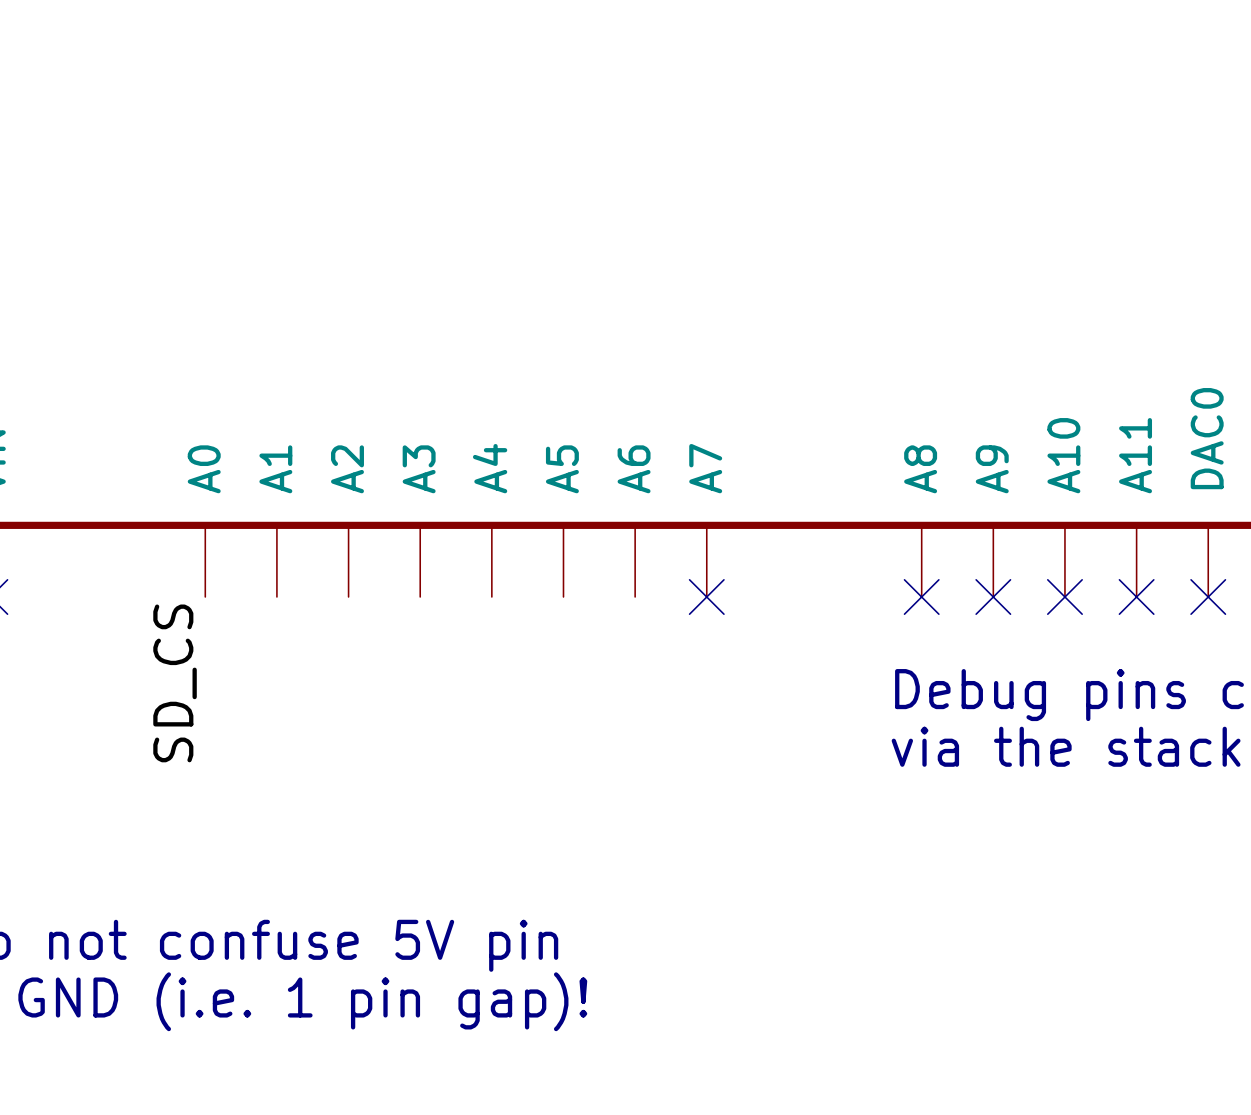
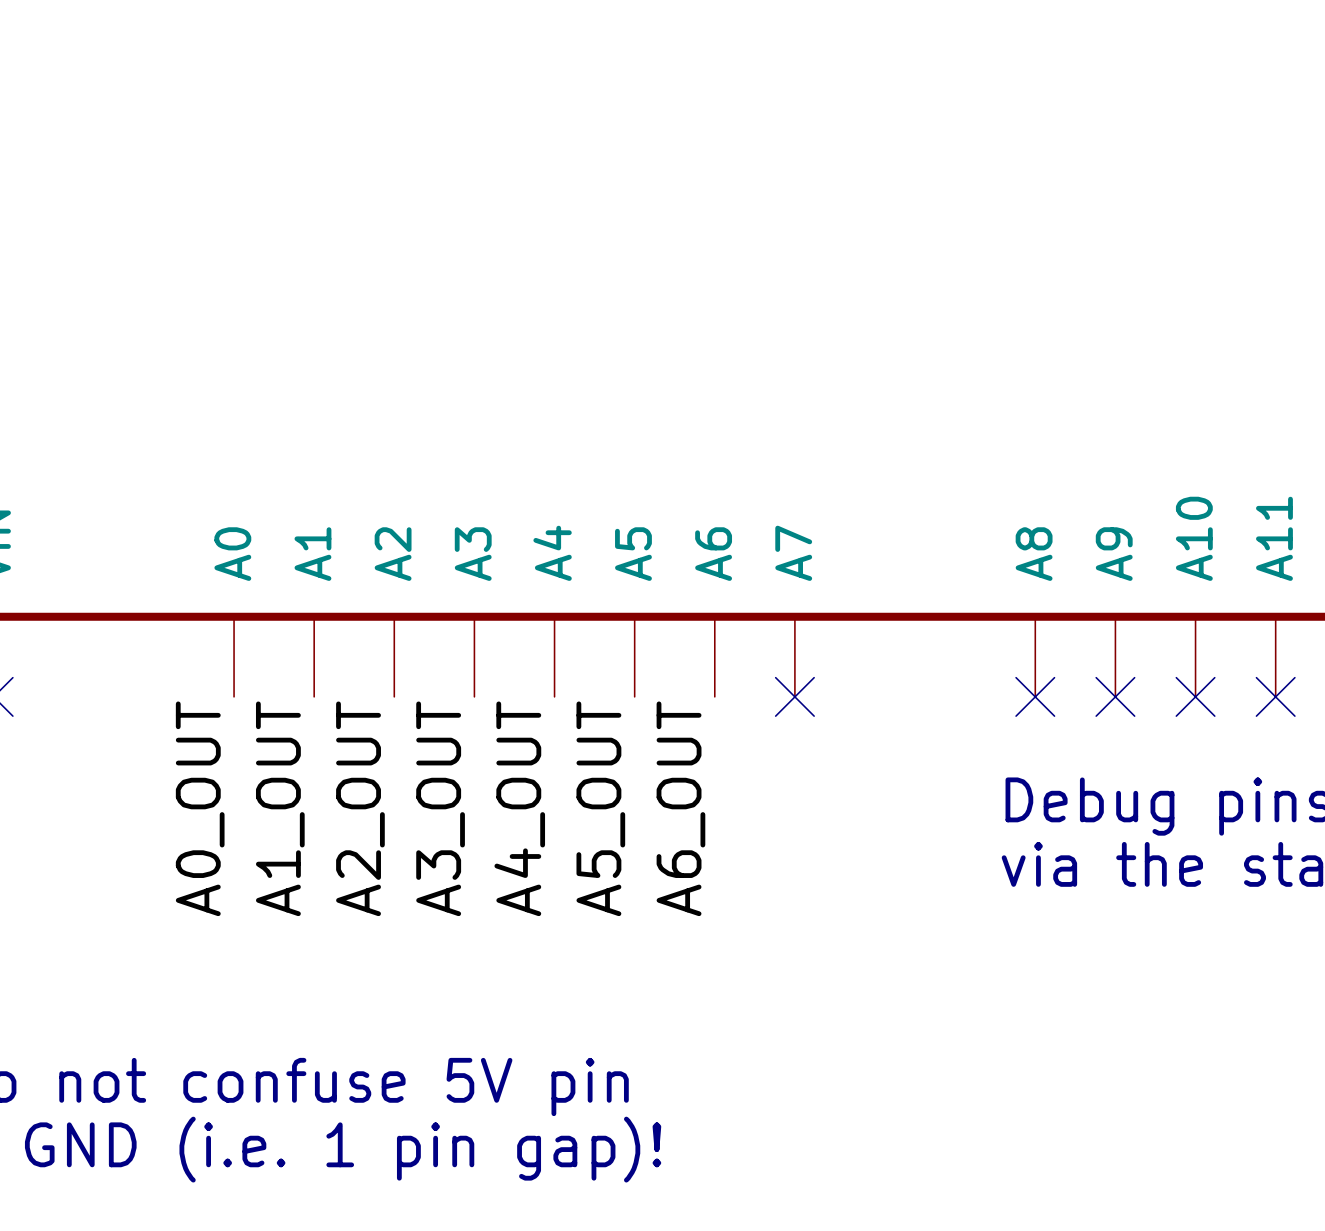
label: SD_CS (175, 683) -> A0_OUT (200, 808)
label: none -> A1_OUT (280, 808)
label: none -> A2_OUT (360, 808)
label: none -> A3_OUT (440, 808)
label: none -> A4_OUT (519, 808)
label: none -> A5_OUT (600, 808)
label: none -> A6_OUT (680, 808)

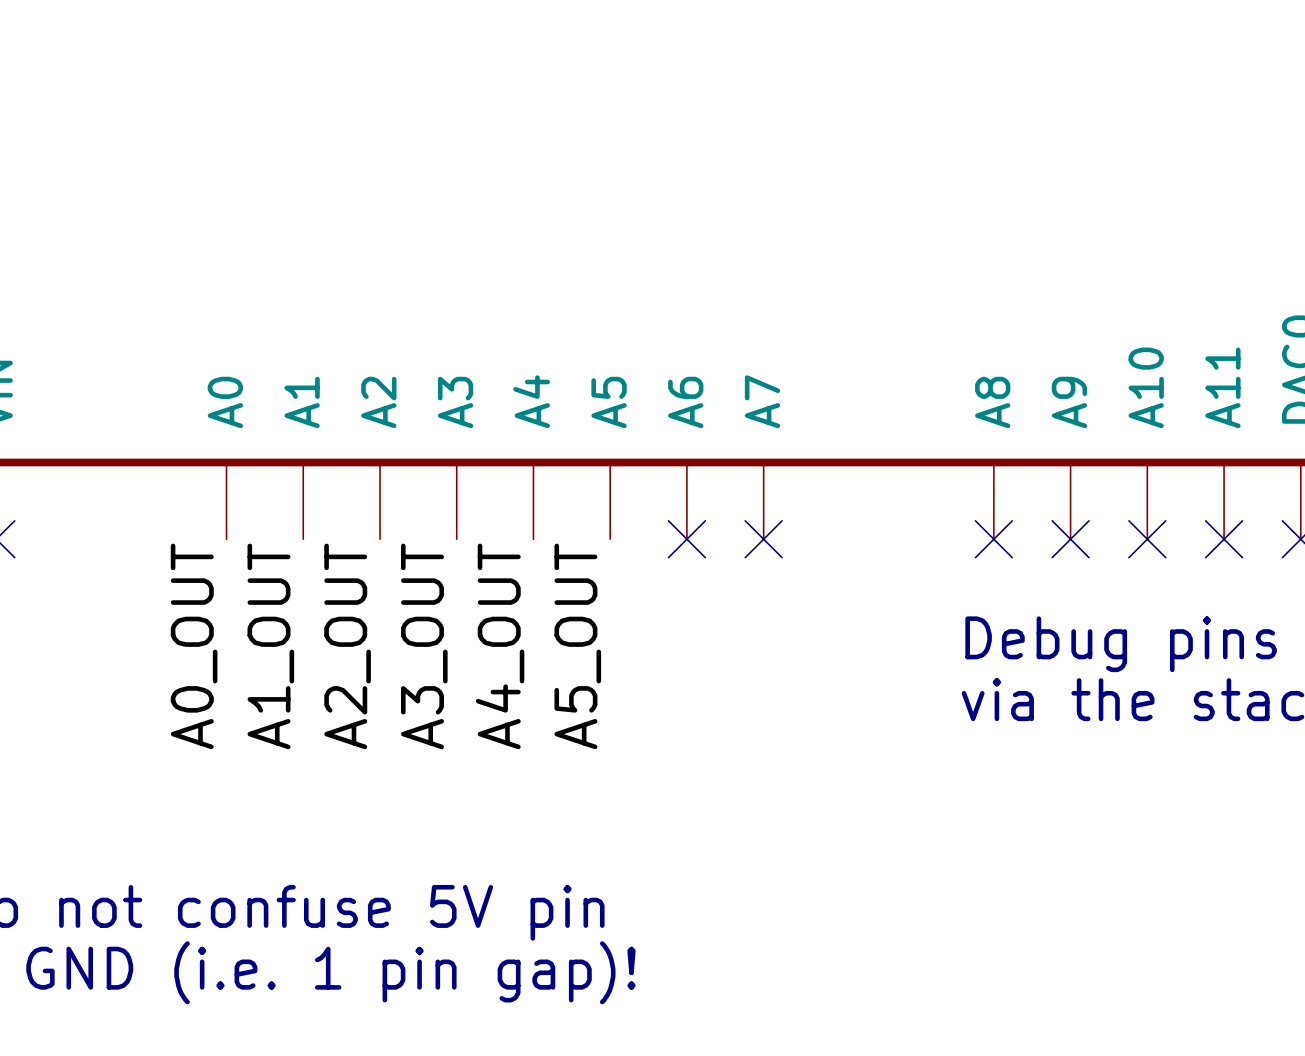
no-connect mark: none -> (686, 539)
label: A6_OUT (680, 808) -> none

